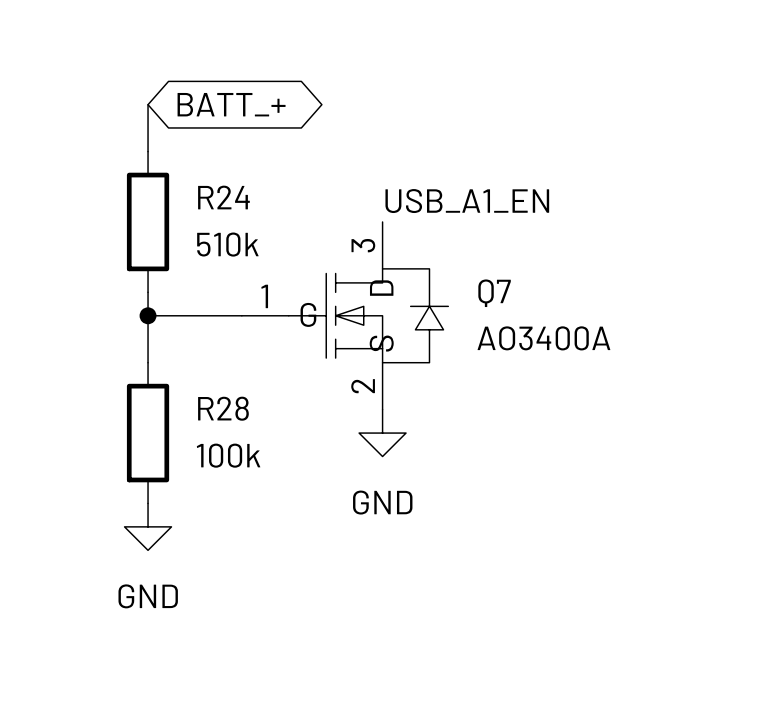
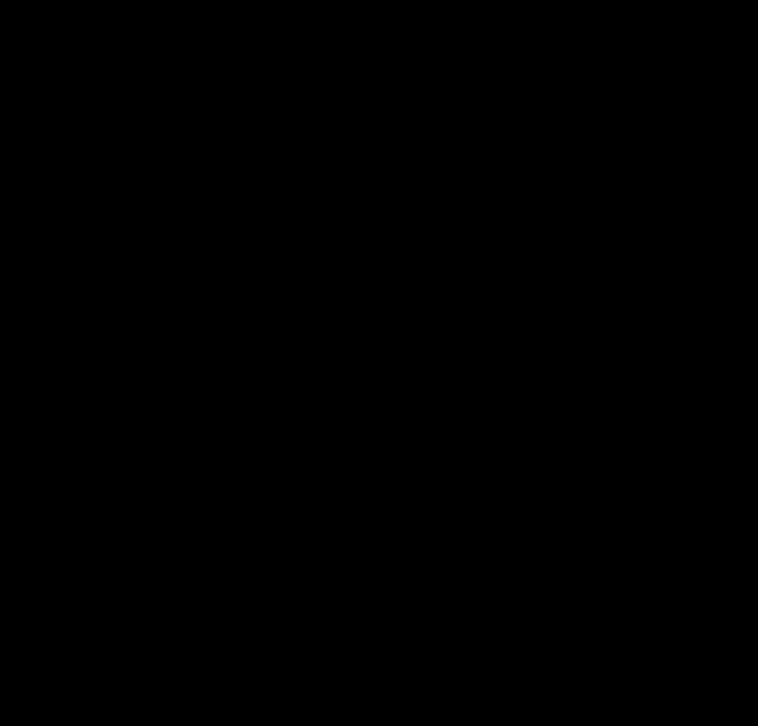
wire: (148, 104) (148, 151) -> none
global label: BATT_+ (231, 104) -> none
label: USB_A1_EN (467, 201) -> none
R24: 510k (148, 221) -> none
wire: (148, 292) (148, 362) -> none
wire: (148, 315) (241, 315) -> none
junction: (148, 315) -> none
Q7: AO3400A (345, 315) -> none
R28: 100k (148, 433) -> none
power symbol: GND (382, 433) -> none
power symbol: GND (148, 526) -> none

